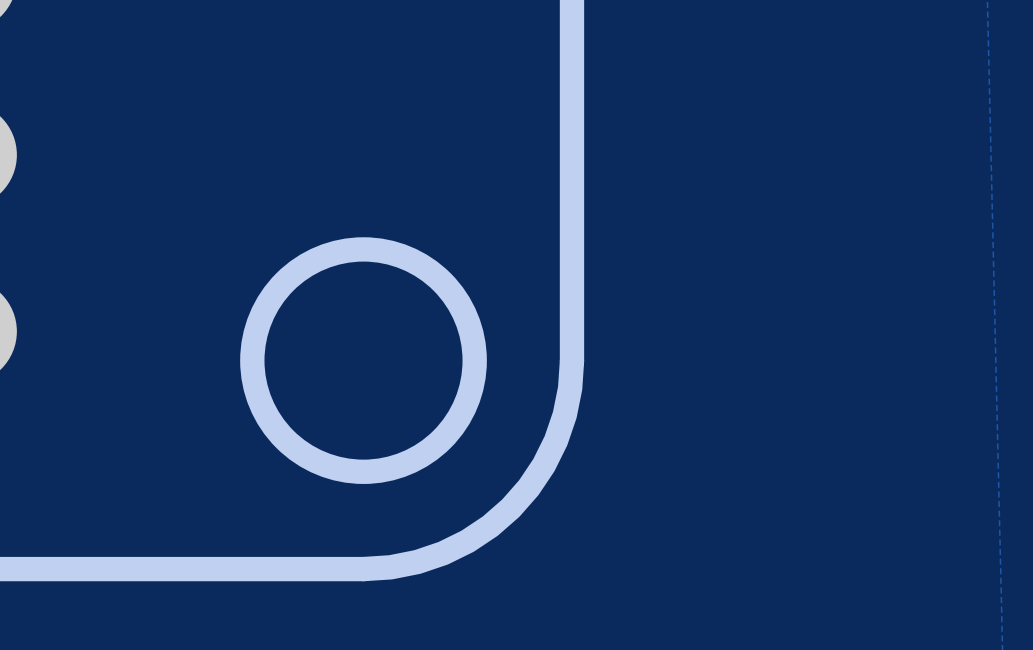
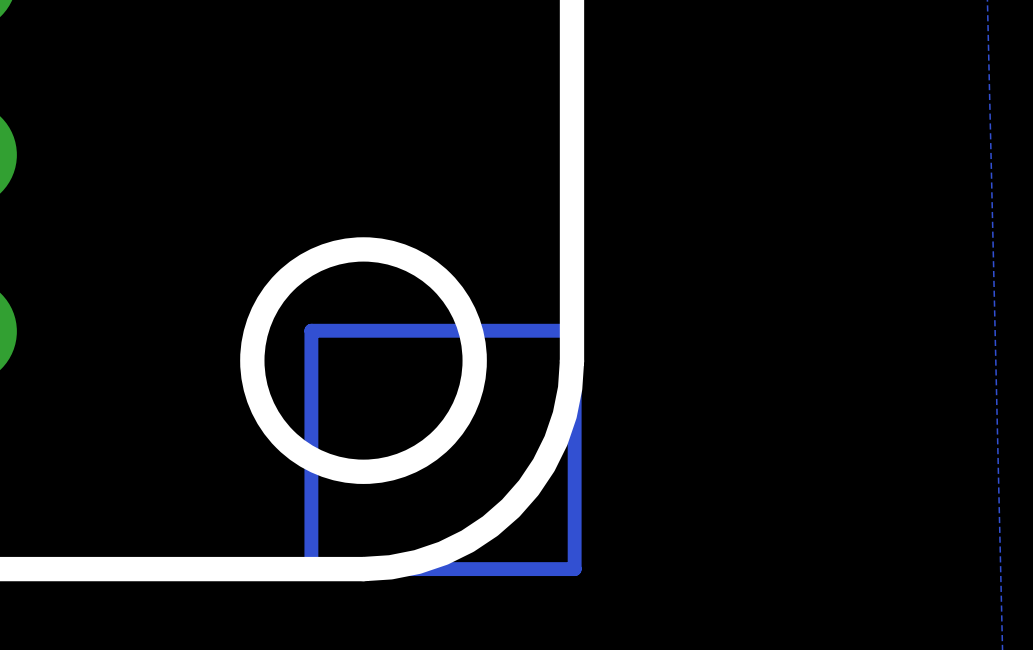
track: none -> (574, 330) (311, 330) (311, 569) (574, 569) (574, 330)

